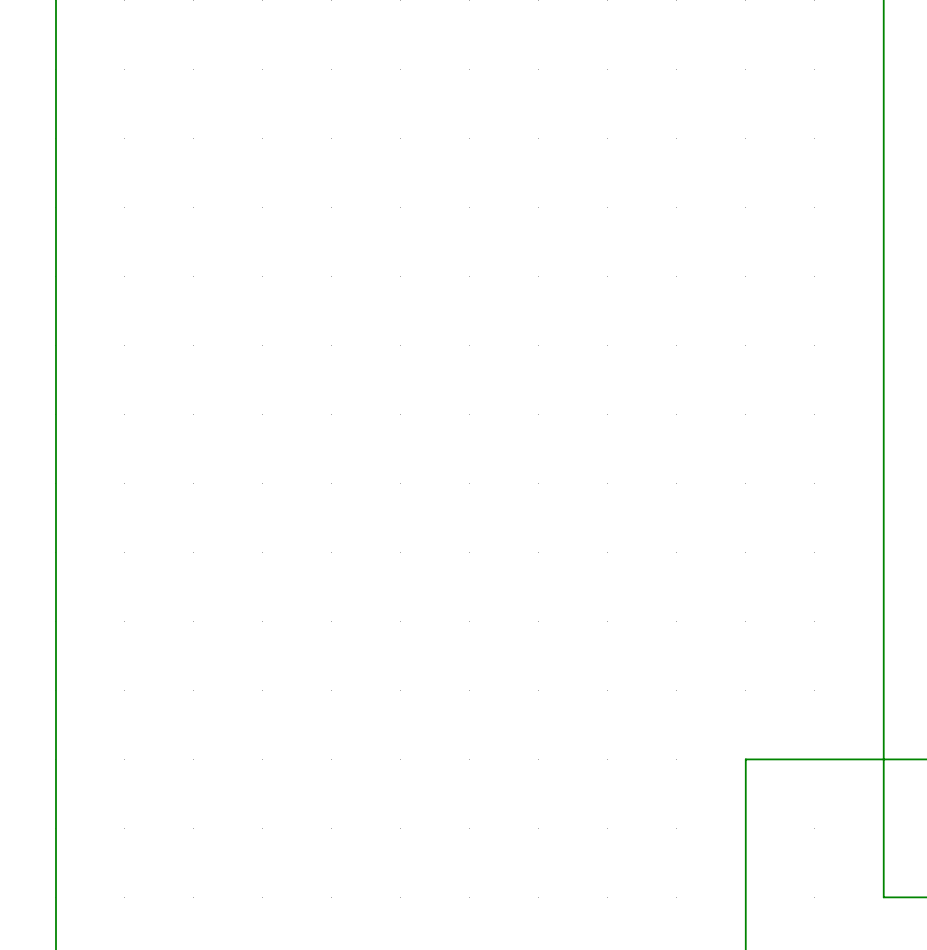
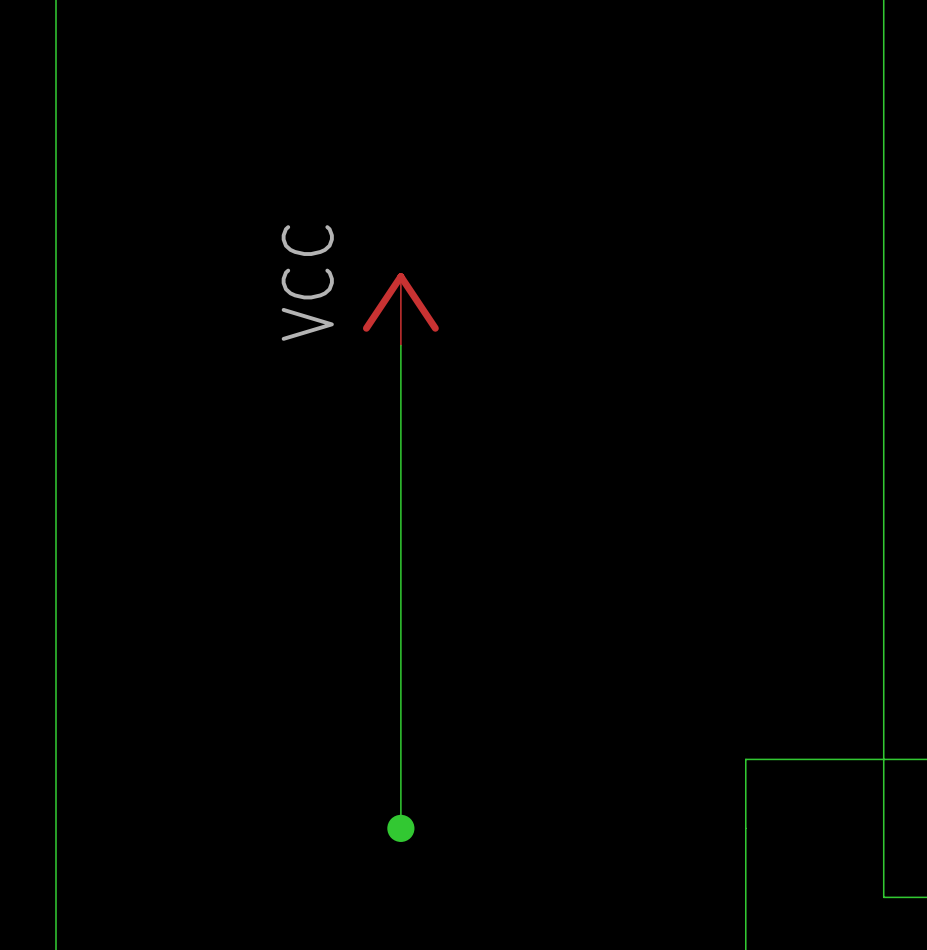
power symbol: none -> VCC (400, 309)
wire: none -> (400, 345) (400, 828)
junction: none -> (400, 828)

